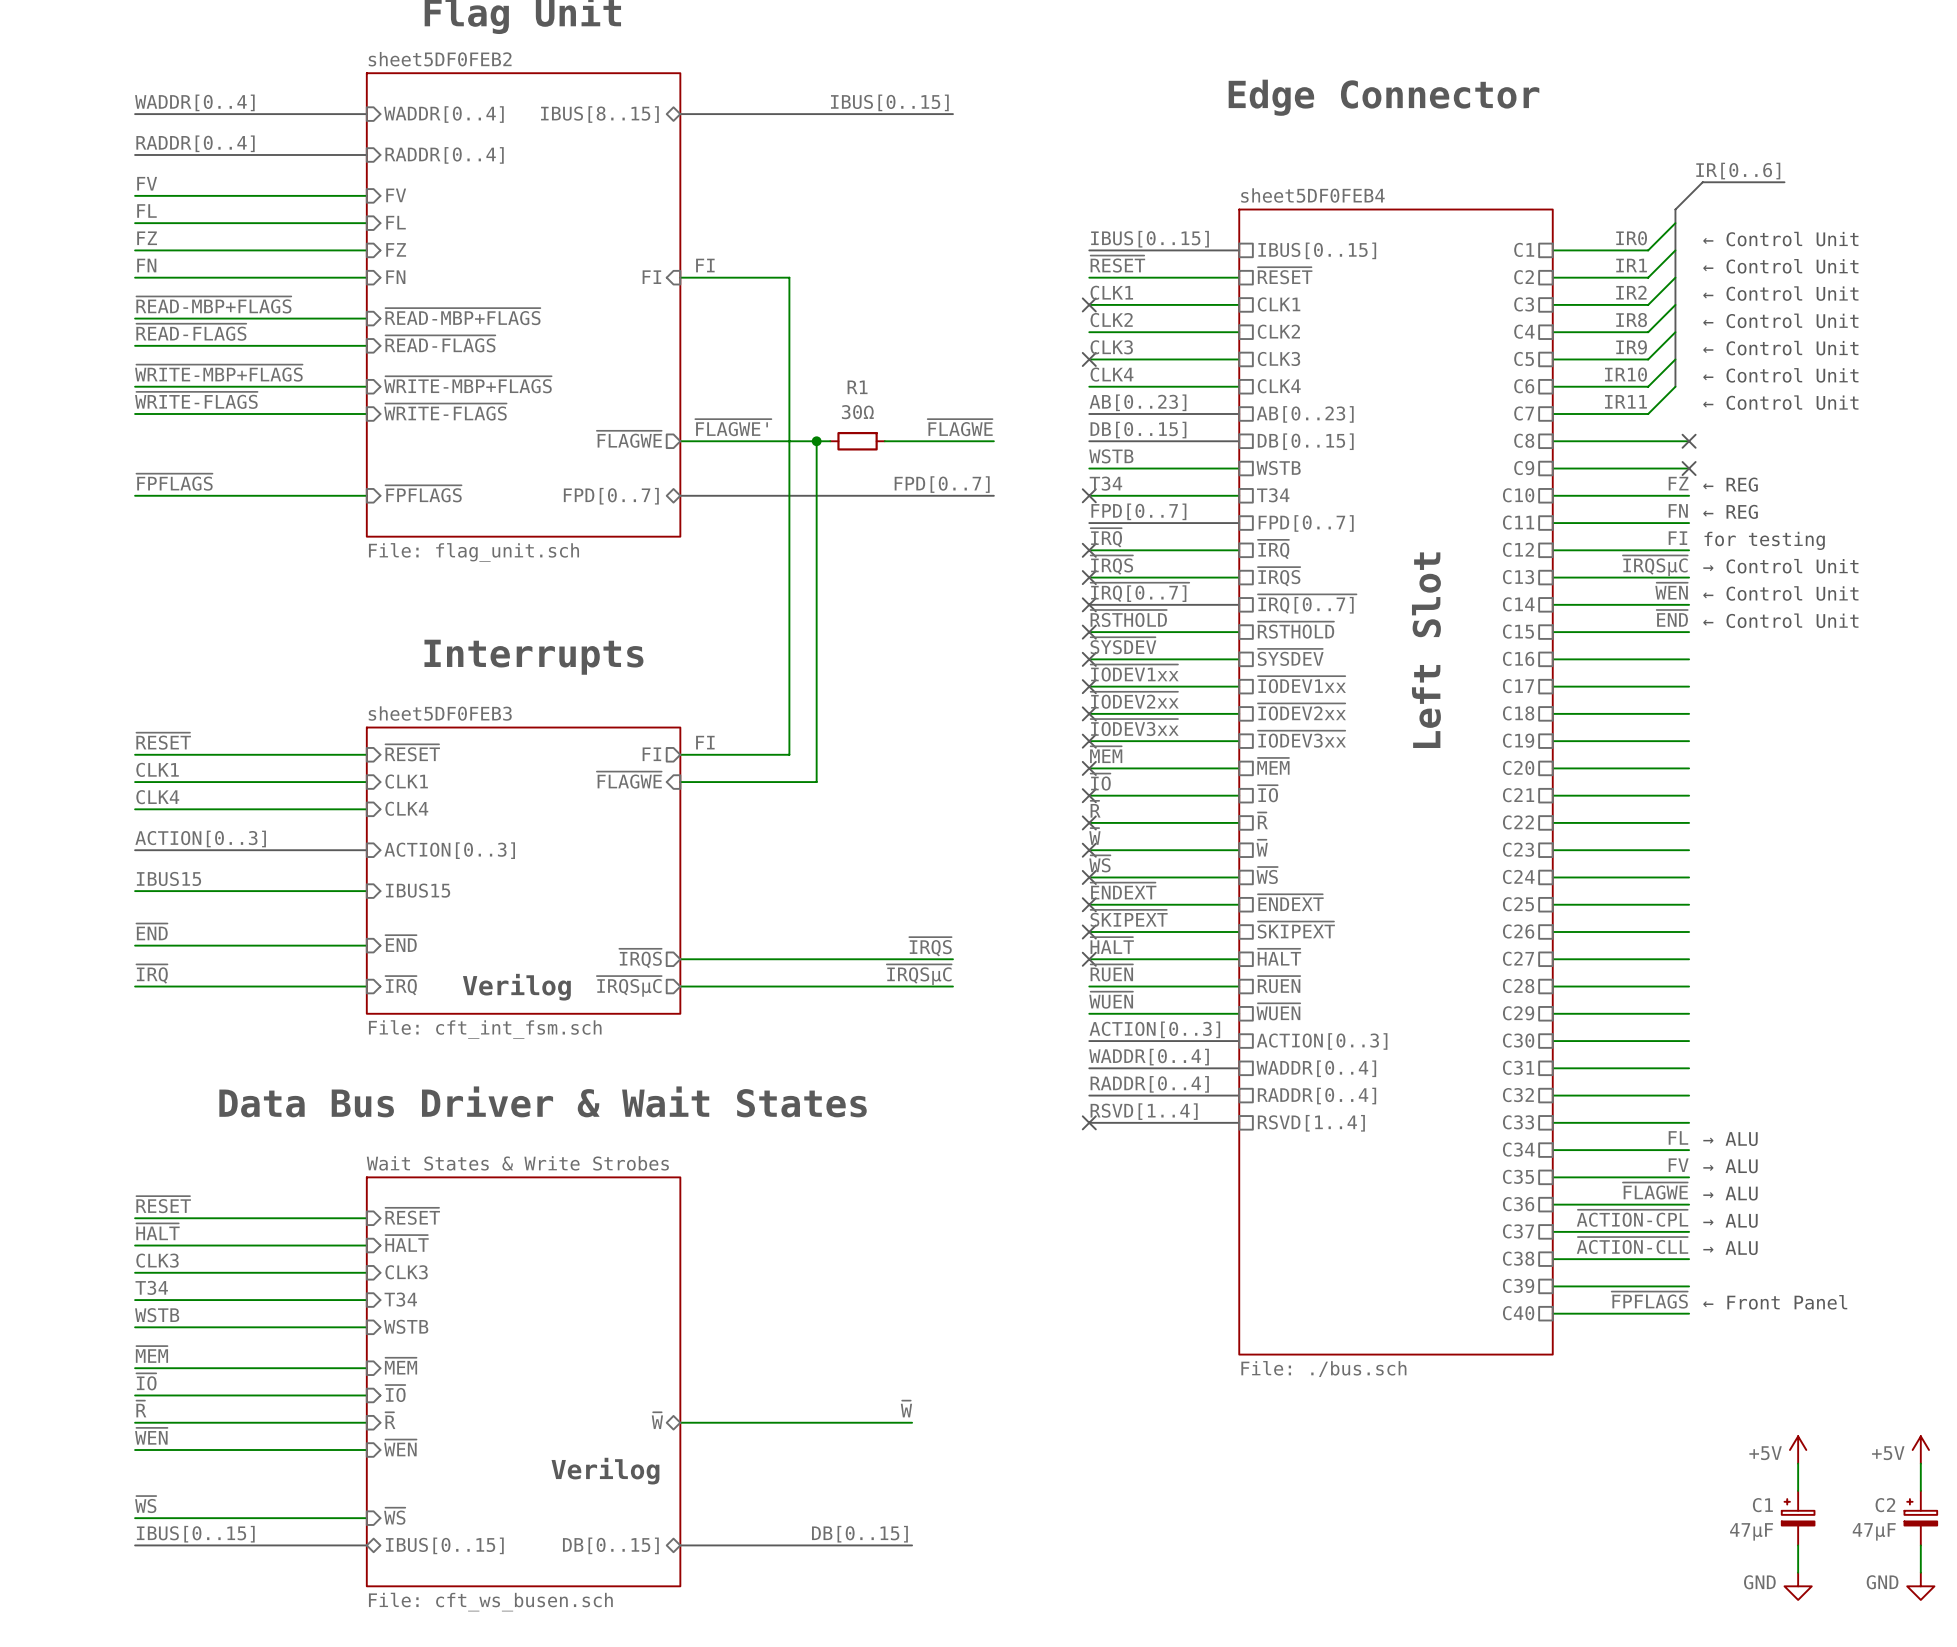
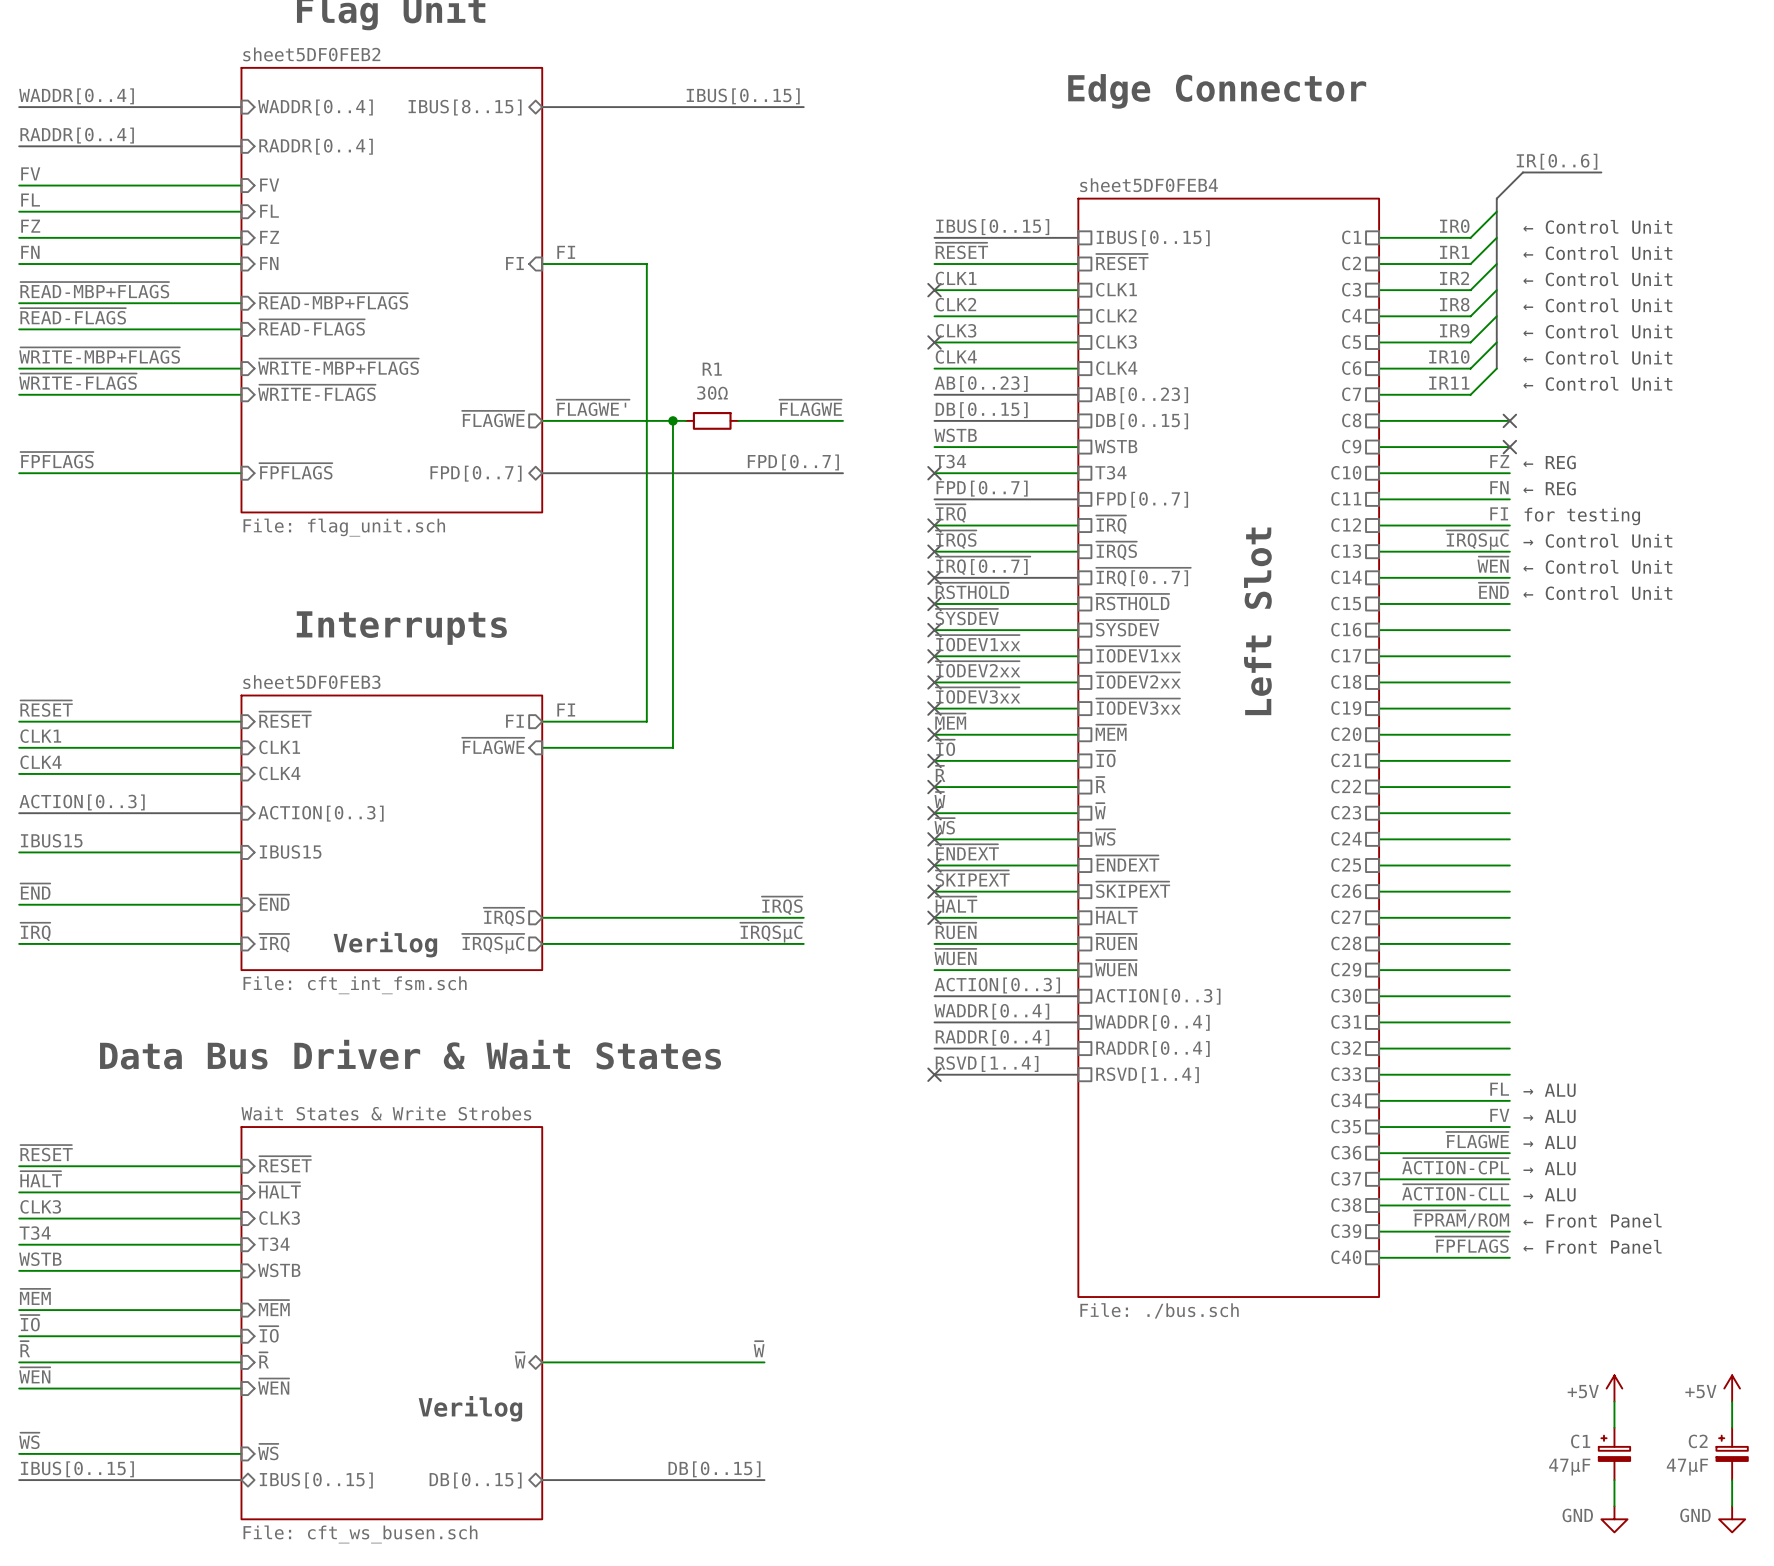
label: none -> ~{FPRAM}∕ROM (1461, 1219)
text: none -> ← Front Panel (1592, 1220)

